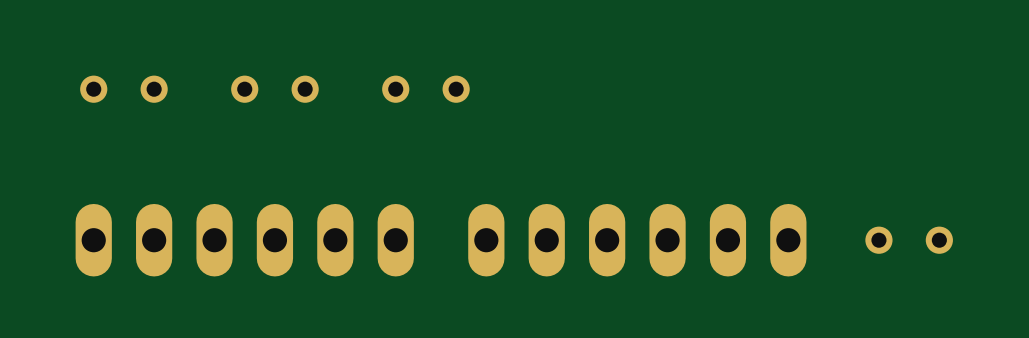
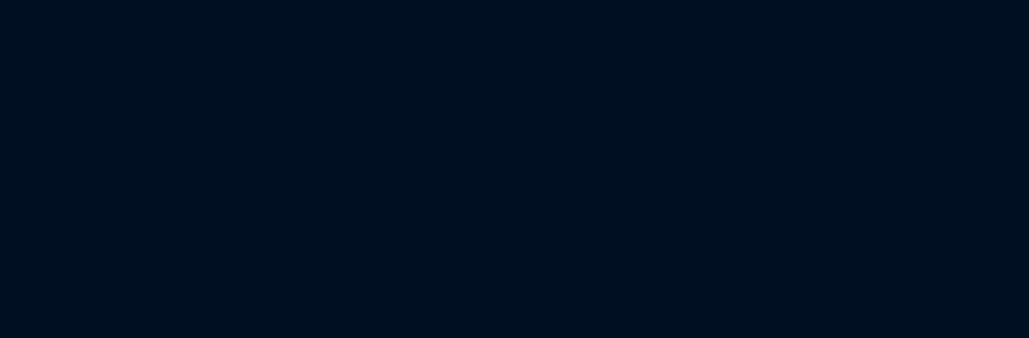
part: (123, 89) -> none
part: (274, 89) -> none
part: (425, 89) -> none
part: (244, 240) -> none
part: (637, 240) -> none
part: (909, 240) -> none

